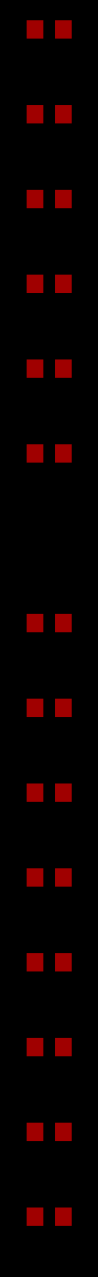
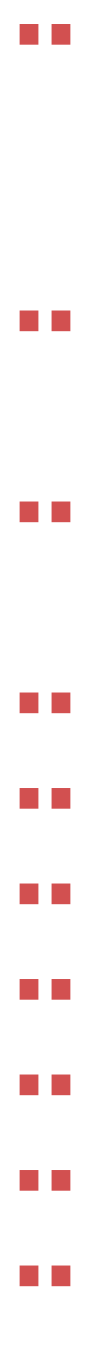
part: (49, 114) -> none
part: (49, 199) -> none
part: (49, 368) -> none

